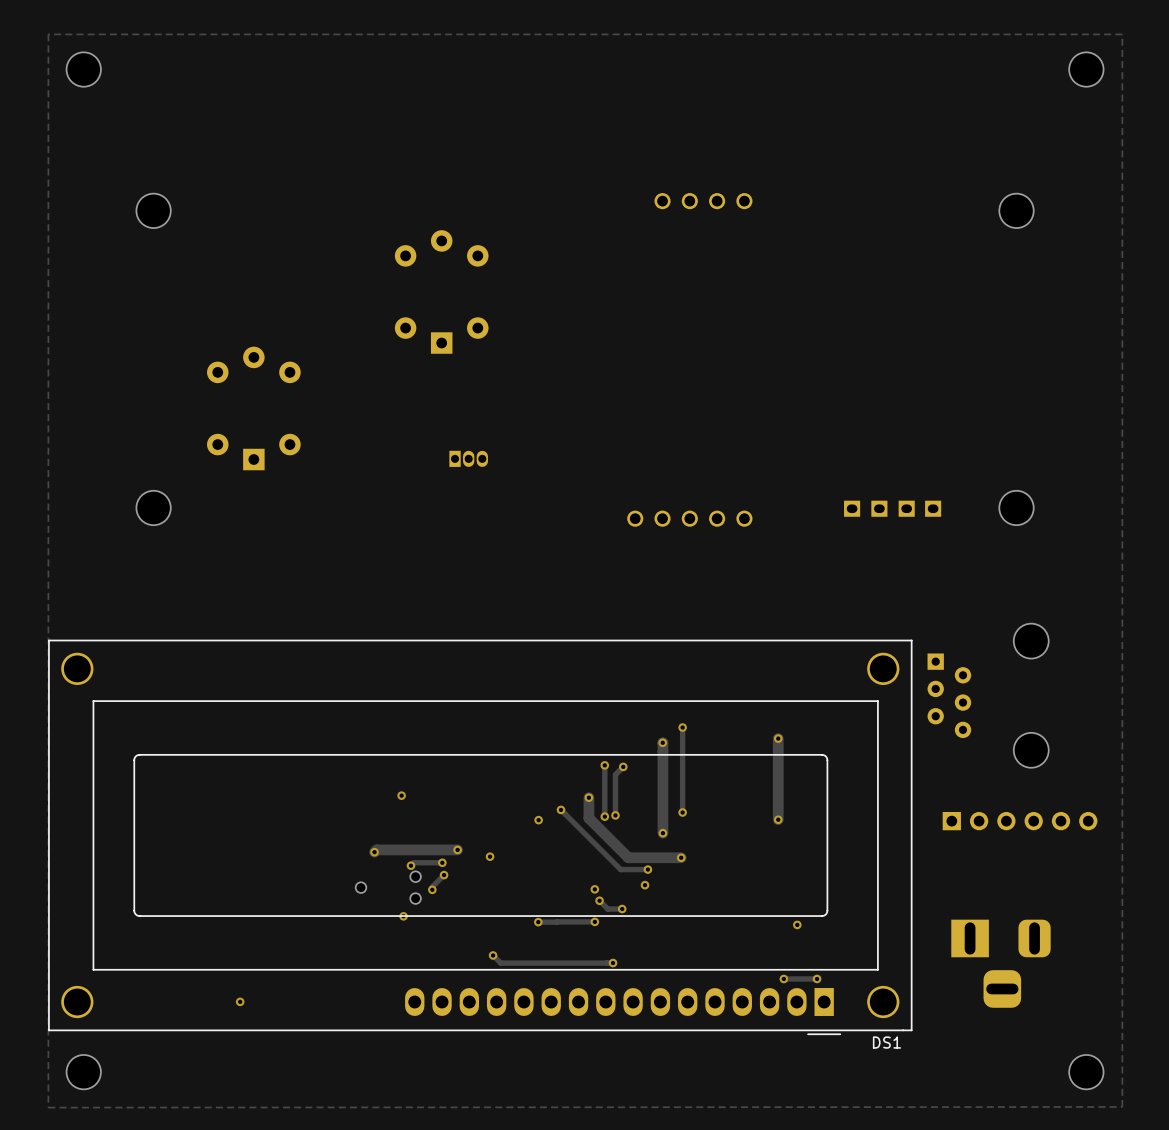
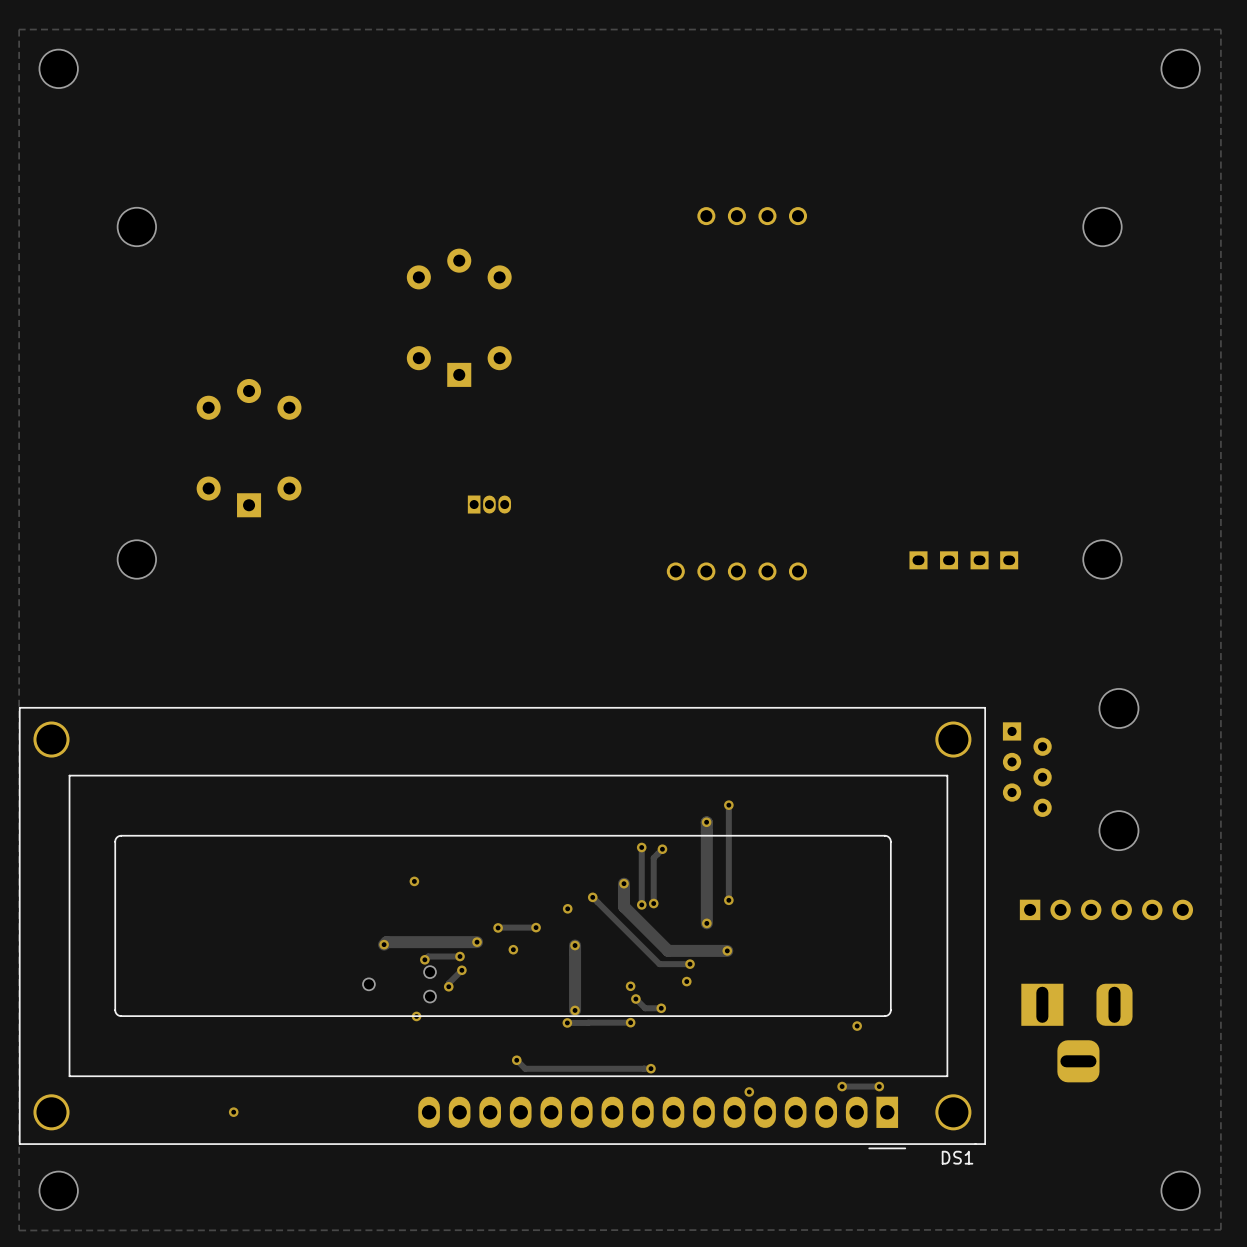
track: (778, 738) (778, 819) -> none
via: (778, 738) -> none
via: (778, 819) -> none
track: none -> (536, 927) (498, 927)
via: none -> (536, 927)
via: none -> (498, 927)
track: none -> (575, 945) (575, 1010)
via: none -> (575, 945)
via: none -> (575, 1010)
part position: (1000, 963) -> (1076, 1033)
via: none -> (749, 1091)

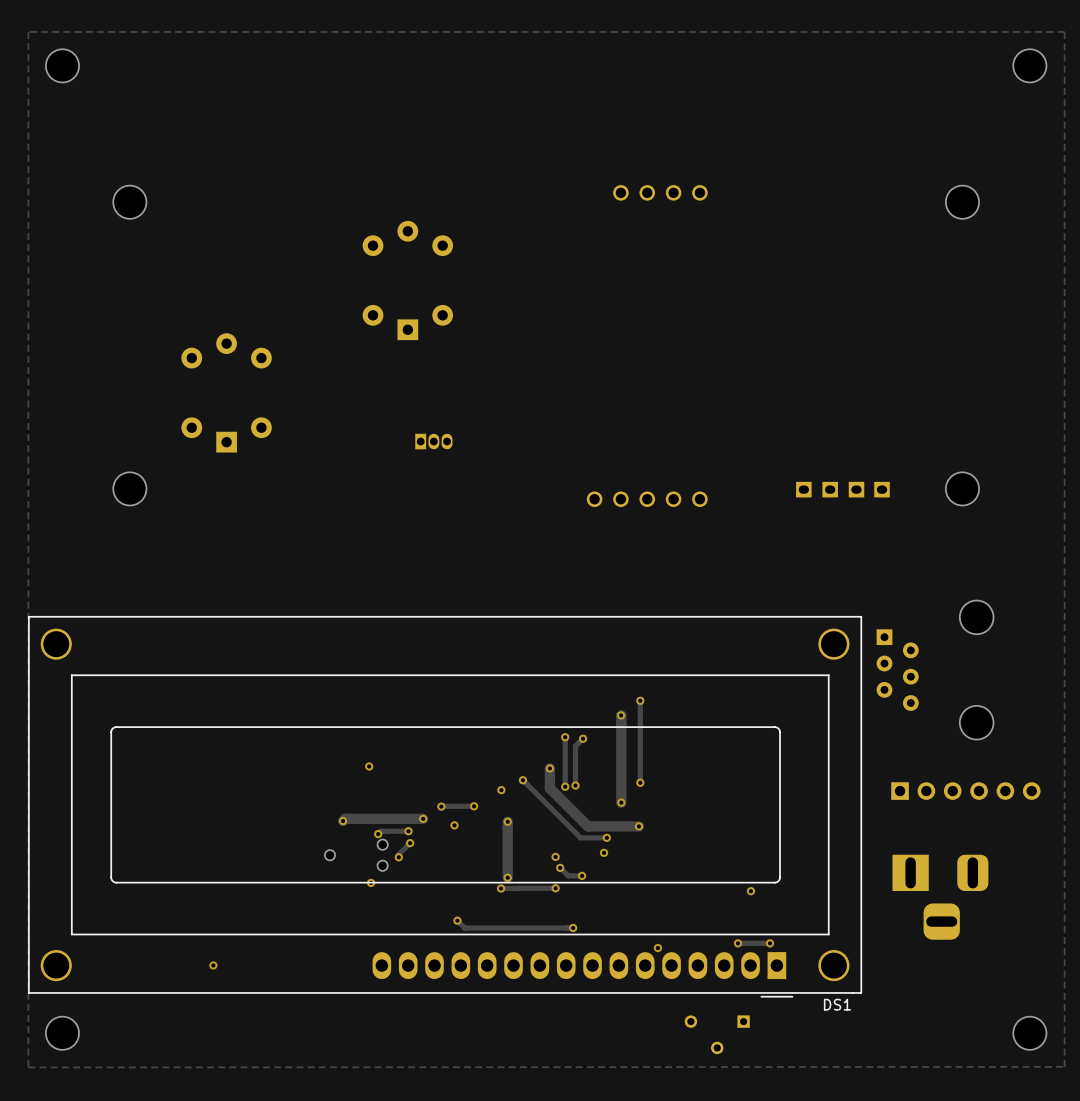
part: none -> (717, 1034)

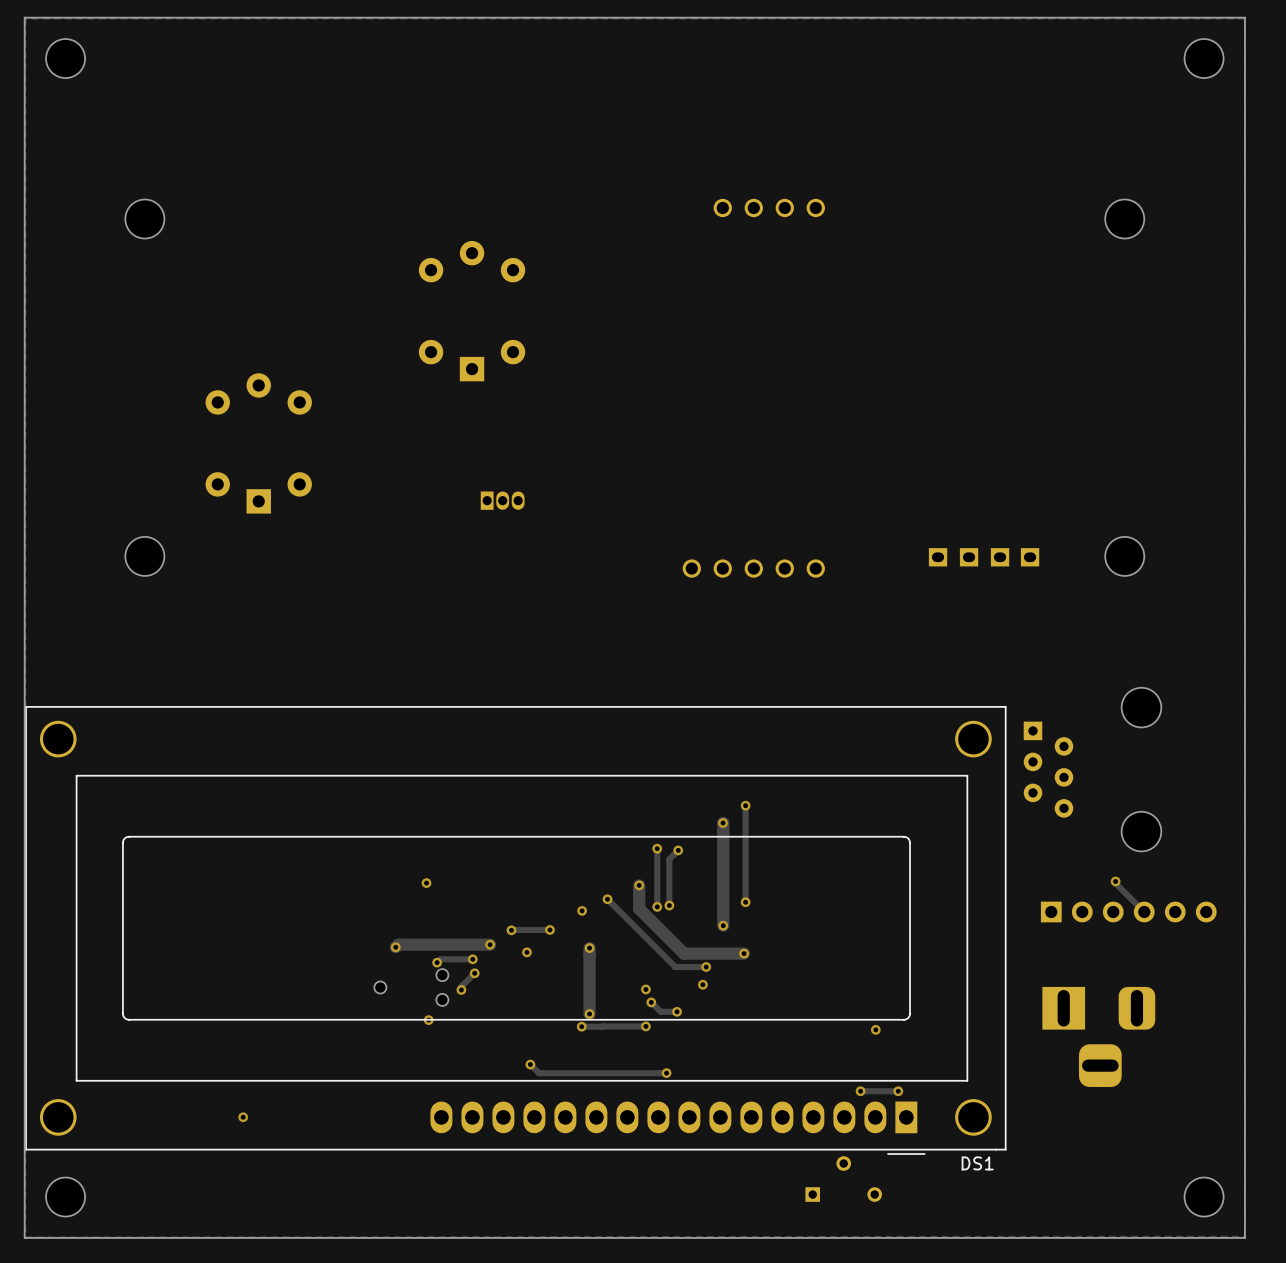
board edge: none -> (1244, 17) (24, 17) (24, 1237) (1244, 1237) (1244, 17)
track: none -> (1115, 881) (1144, 911)
via: none -> (1115, 881)
via: (657, 948) -> none
part rotation: 0° (717, 1034) -> 180° (843, 1179)

